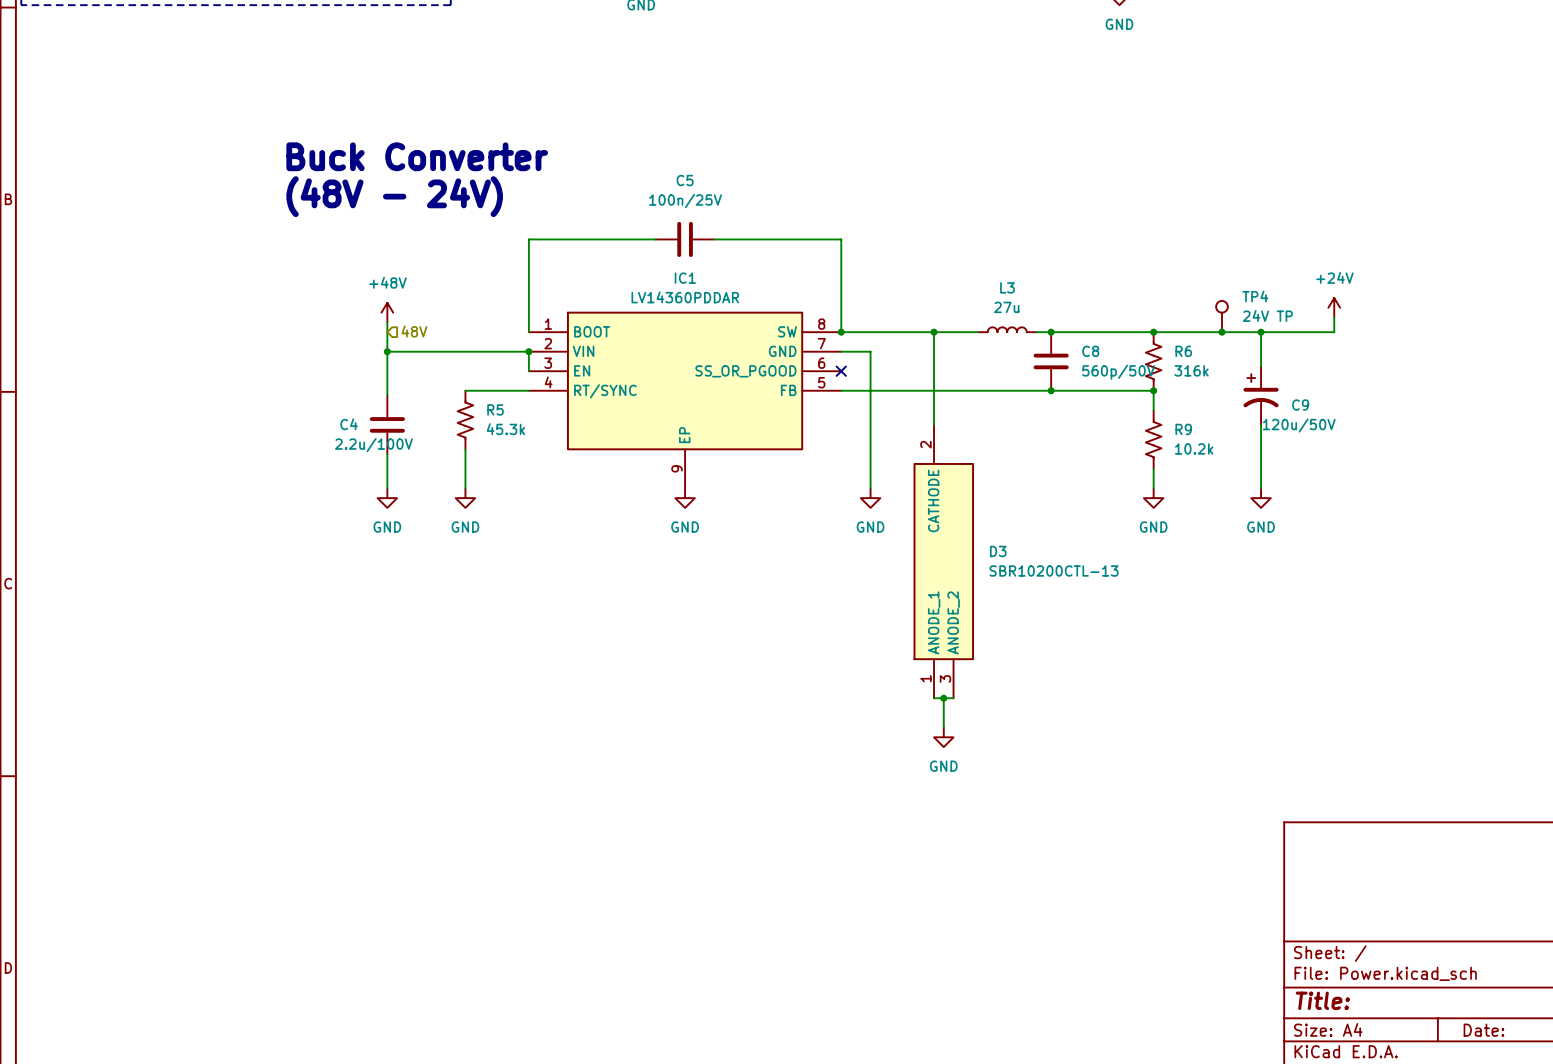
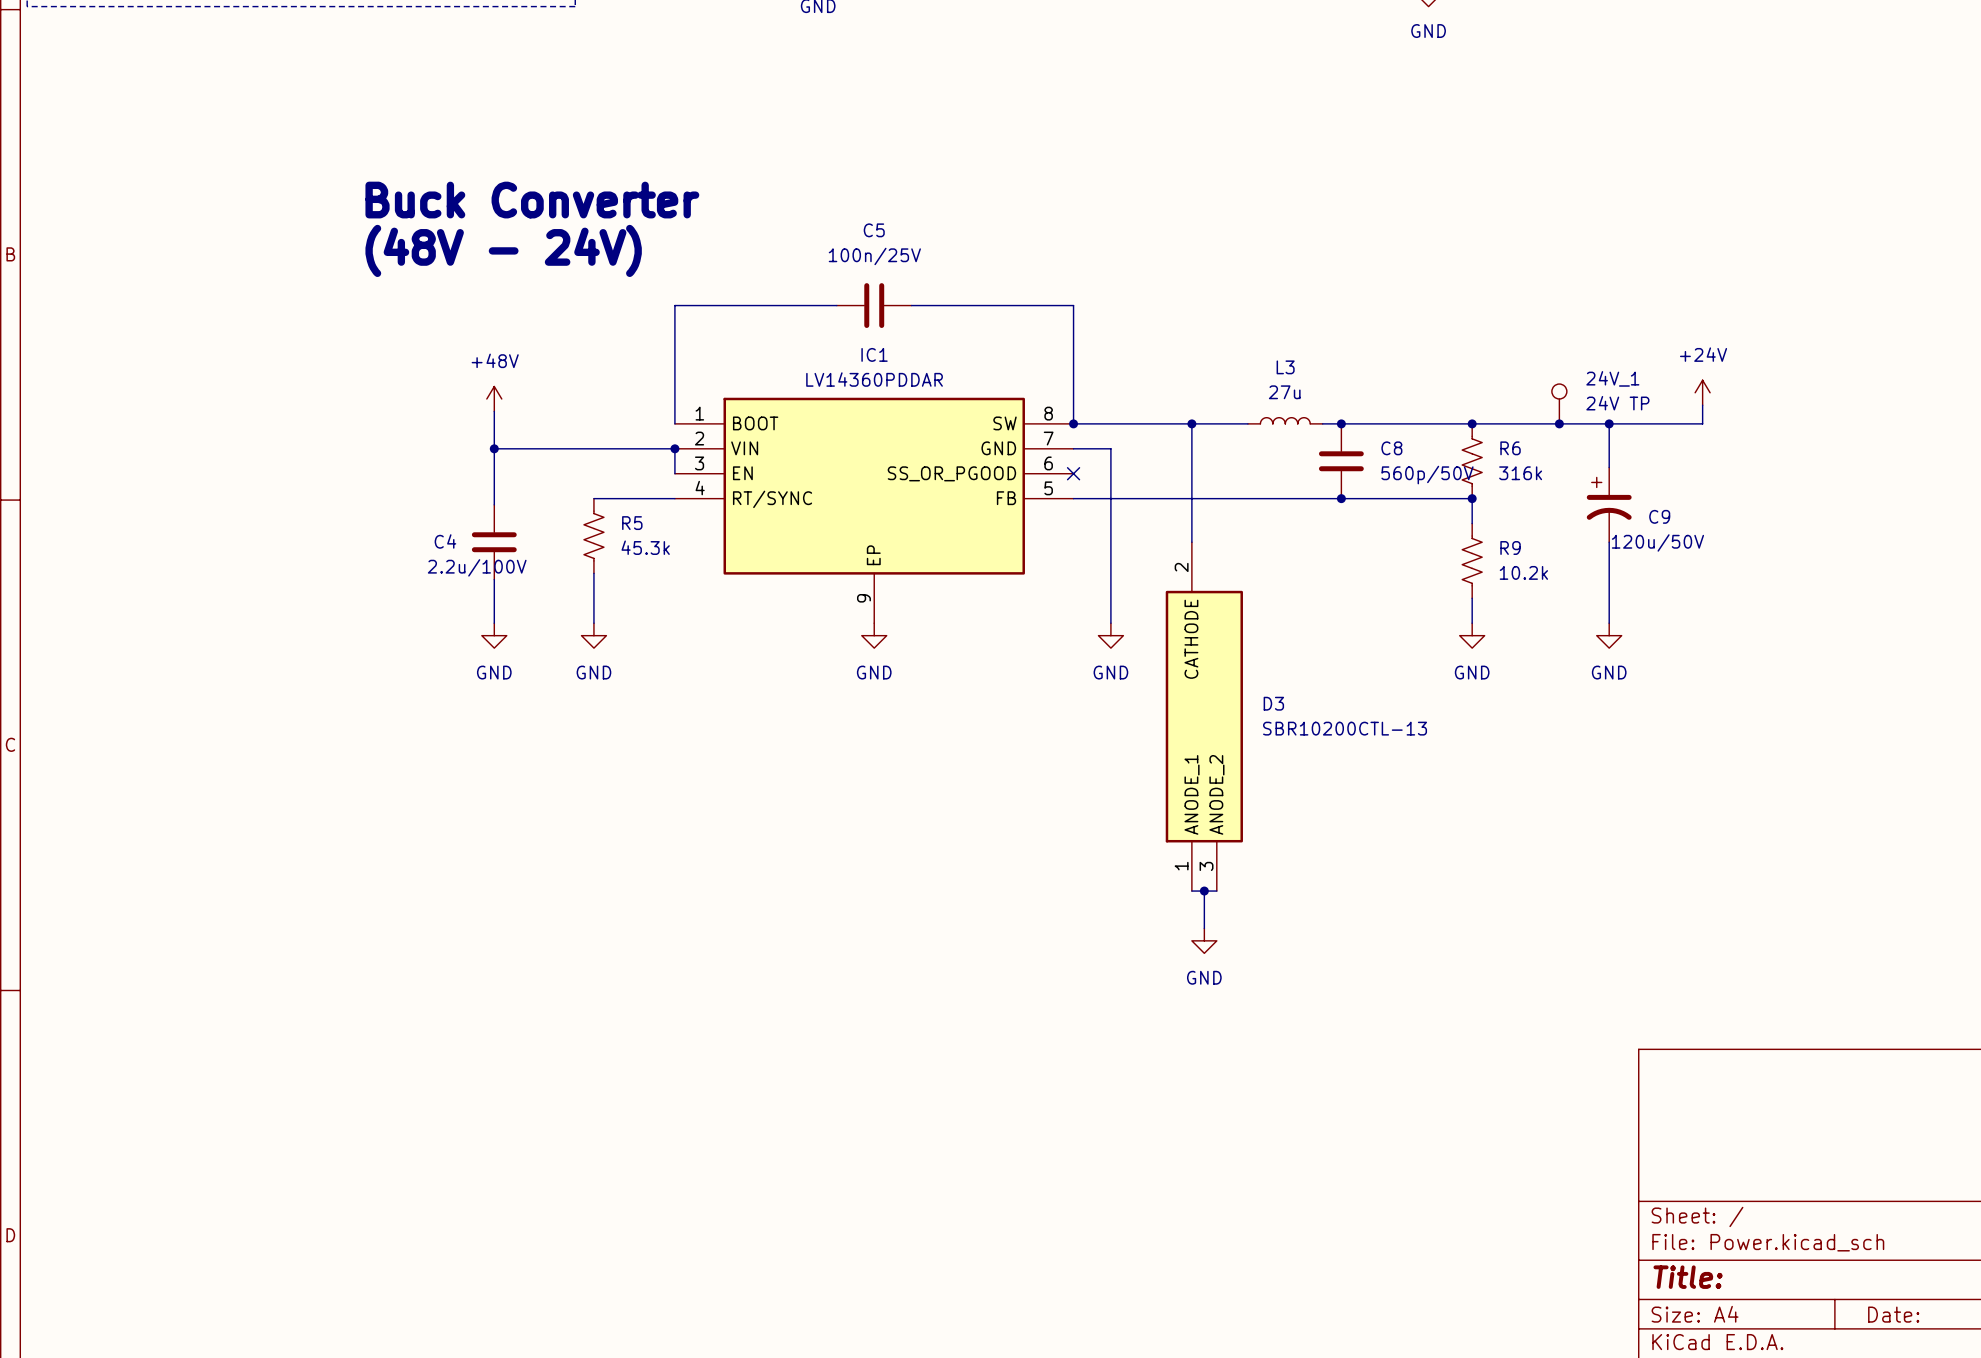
TP4 name: TP4 (1255, 296) -> 24V_1 (1612, 378)
hierarchical label: 48V (414, 331) -> none

